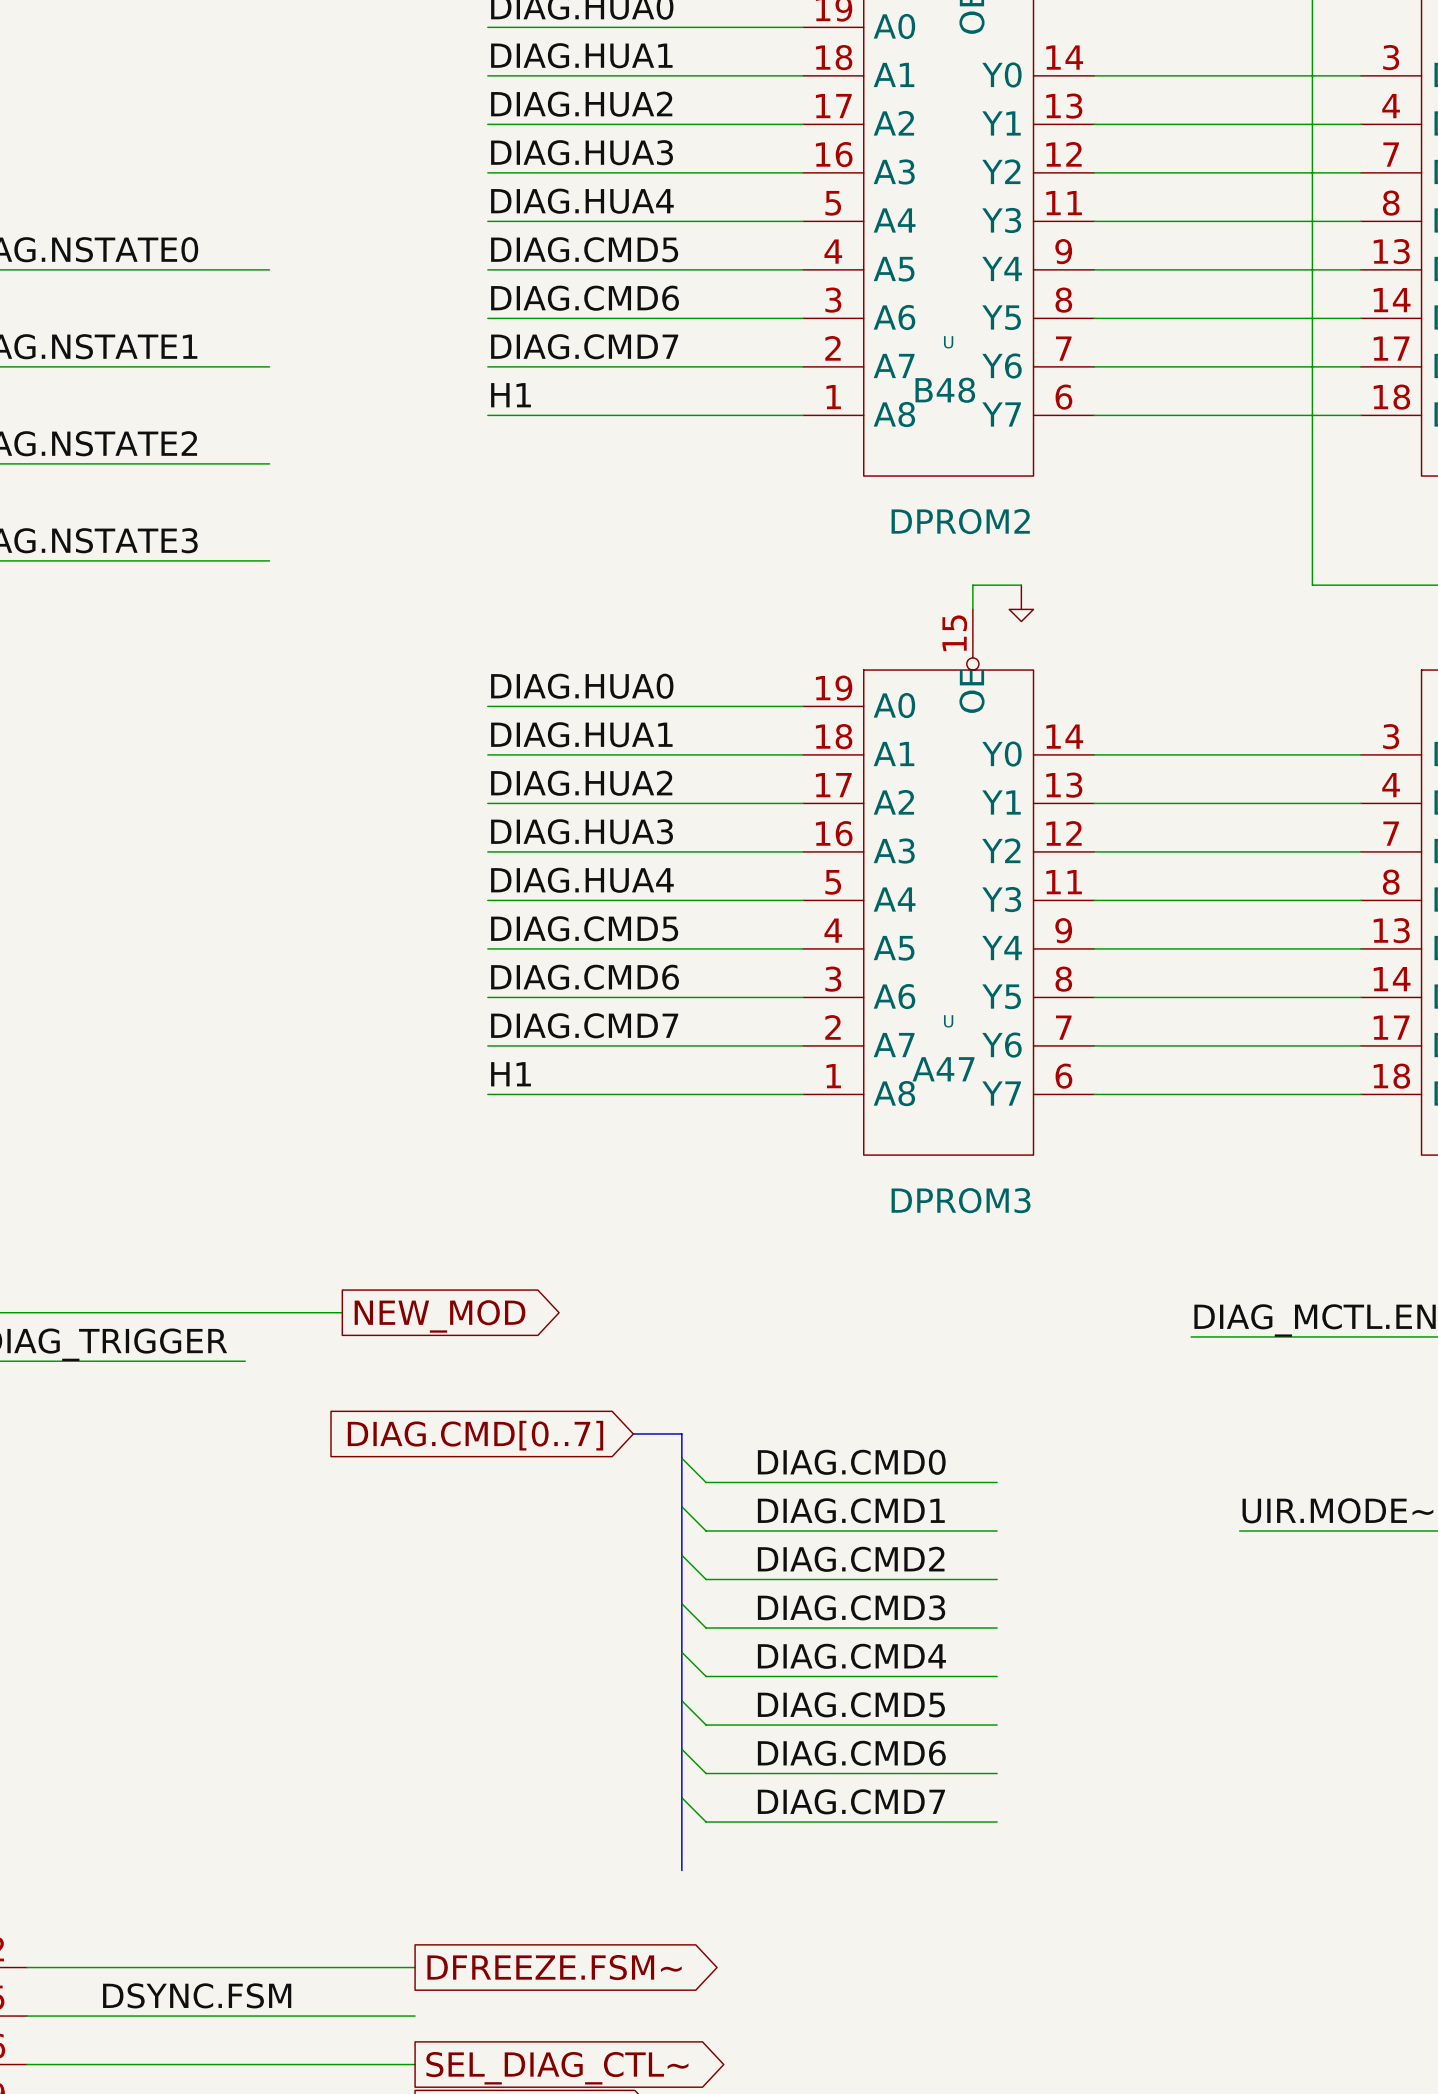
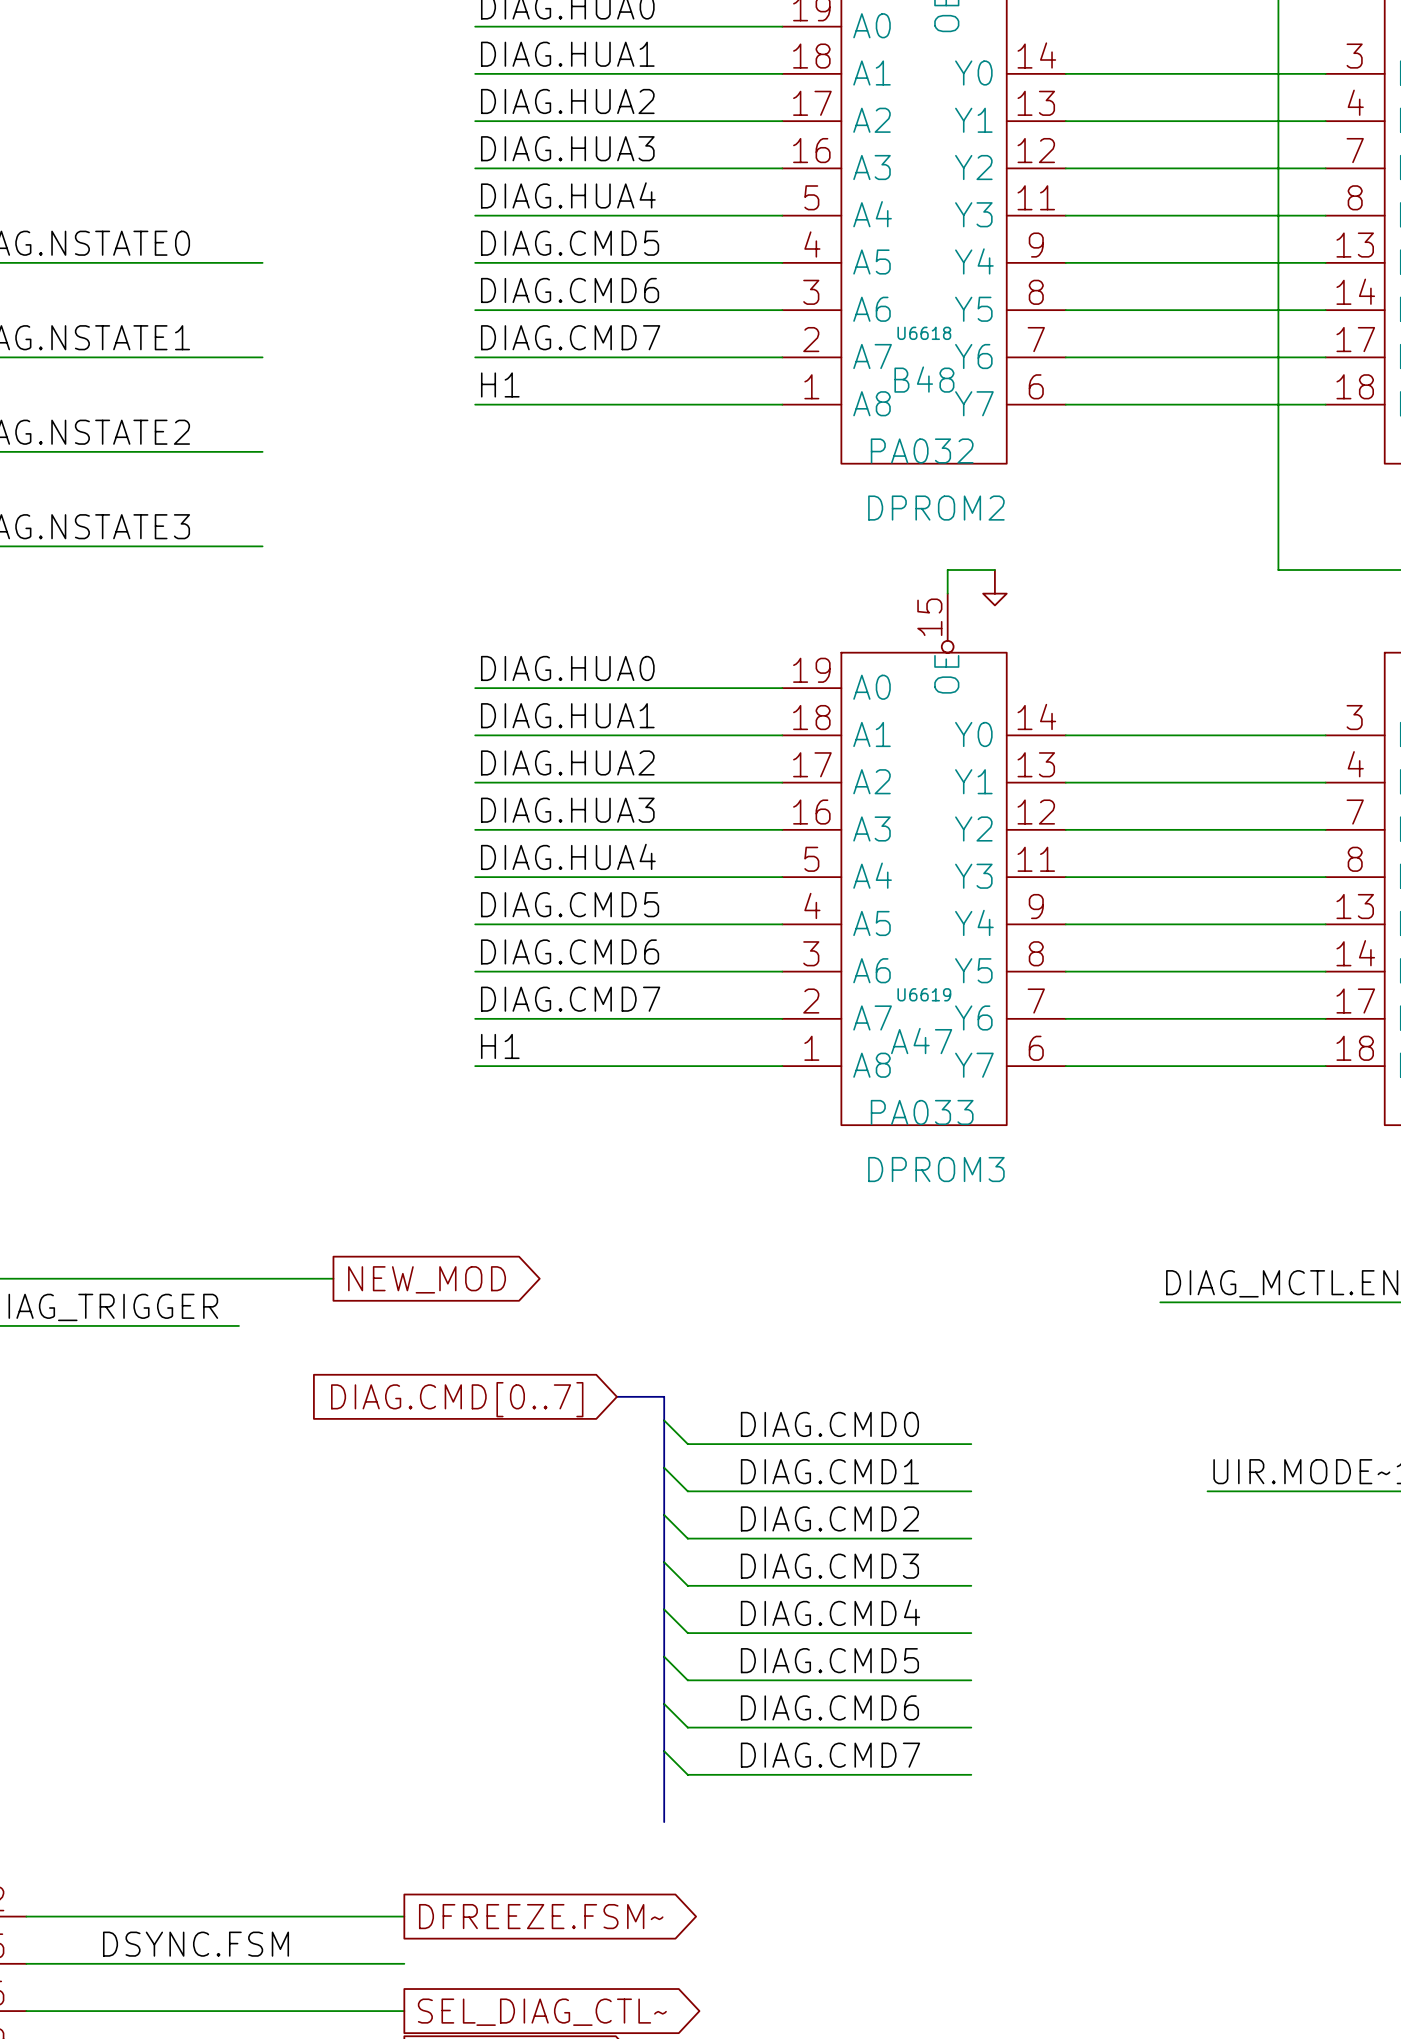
U name: U (948, 342) -> U6618 (924, 333)
U value: none -> PA032 (922, 451)
U name: U (948, 1021) -> U6619 (924, 994)
U value: none -> PA033 (922, 1112)

